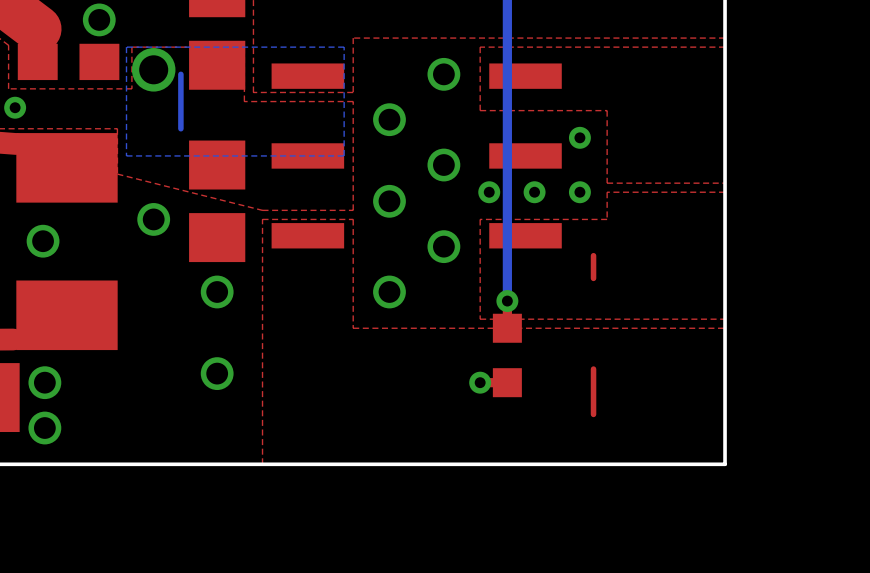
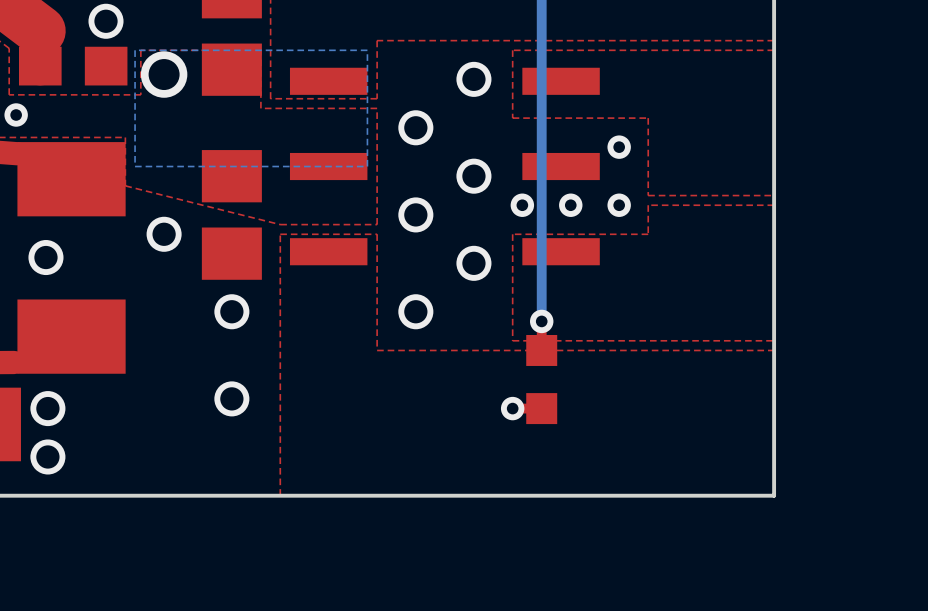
bottom track: (180, 74) (180, 128) -> none
top track: (593, 255) (593, 278) -> none
top track: (593, 369) (593, 414) -> none

